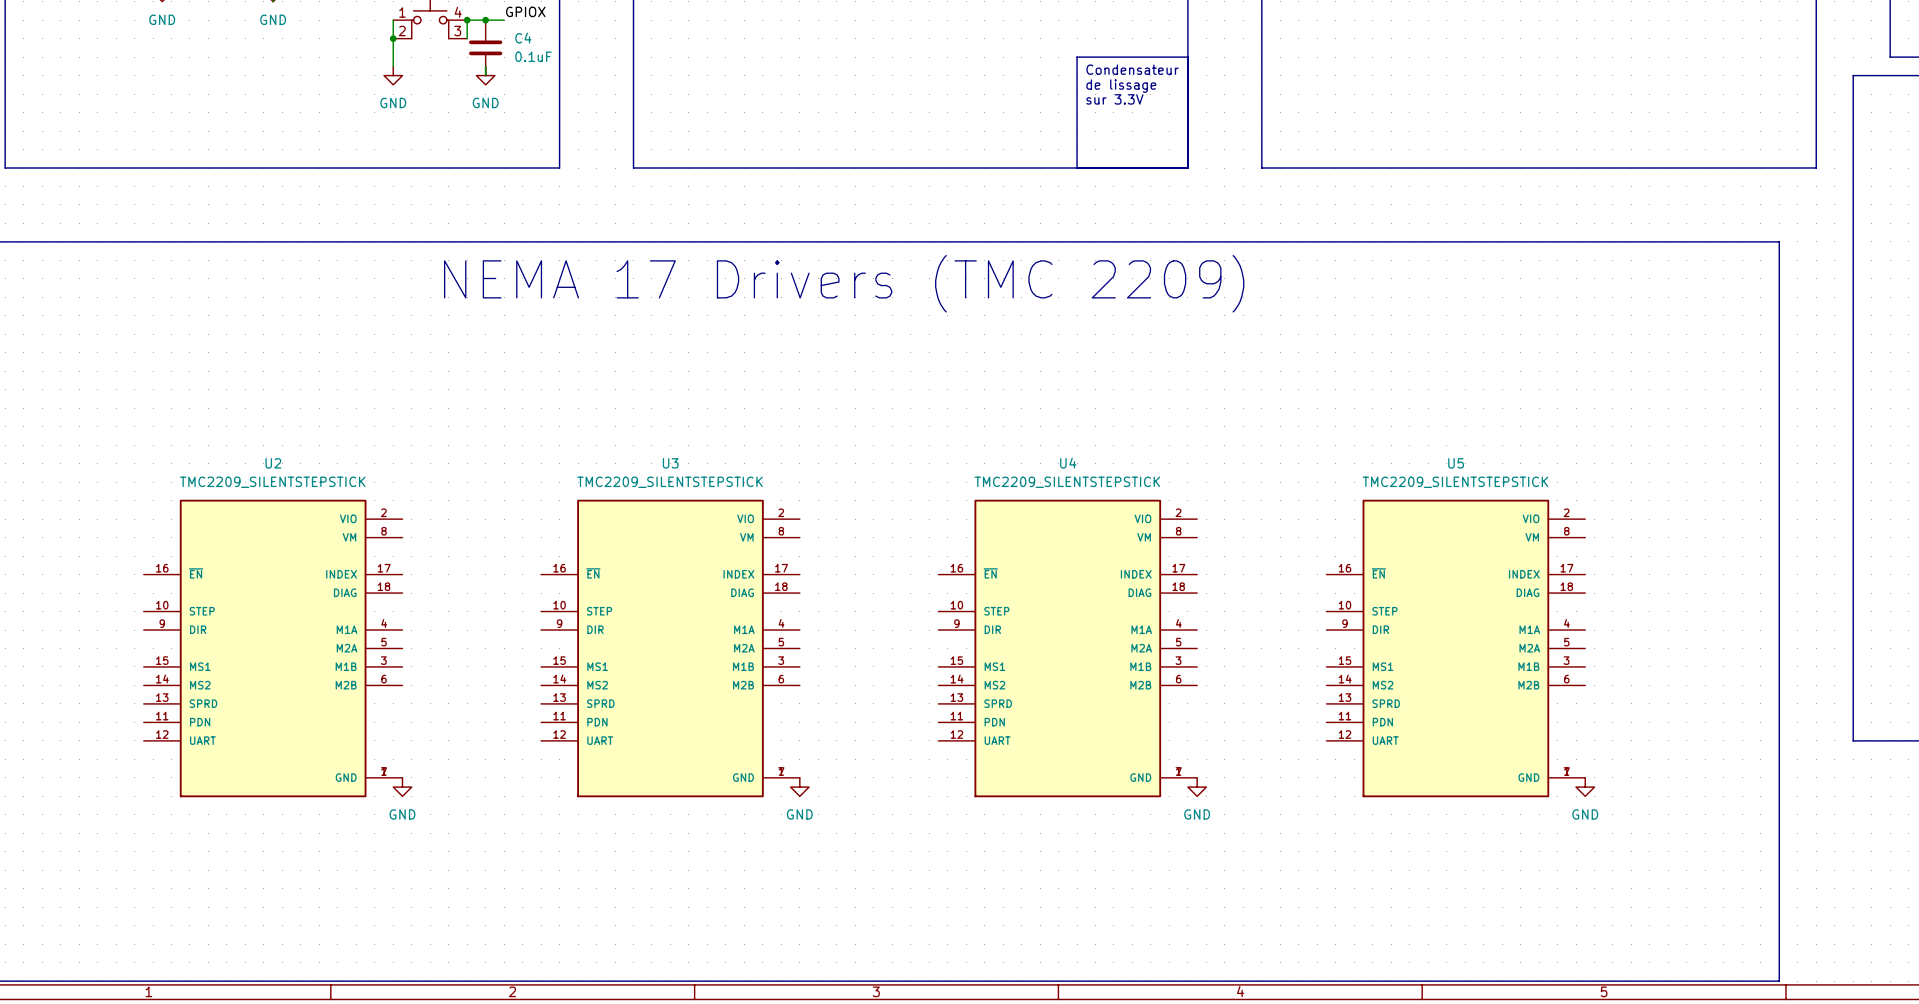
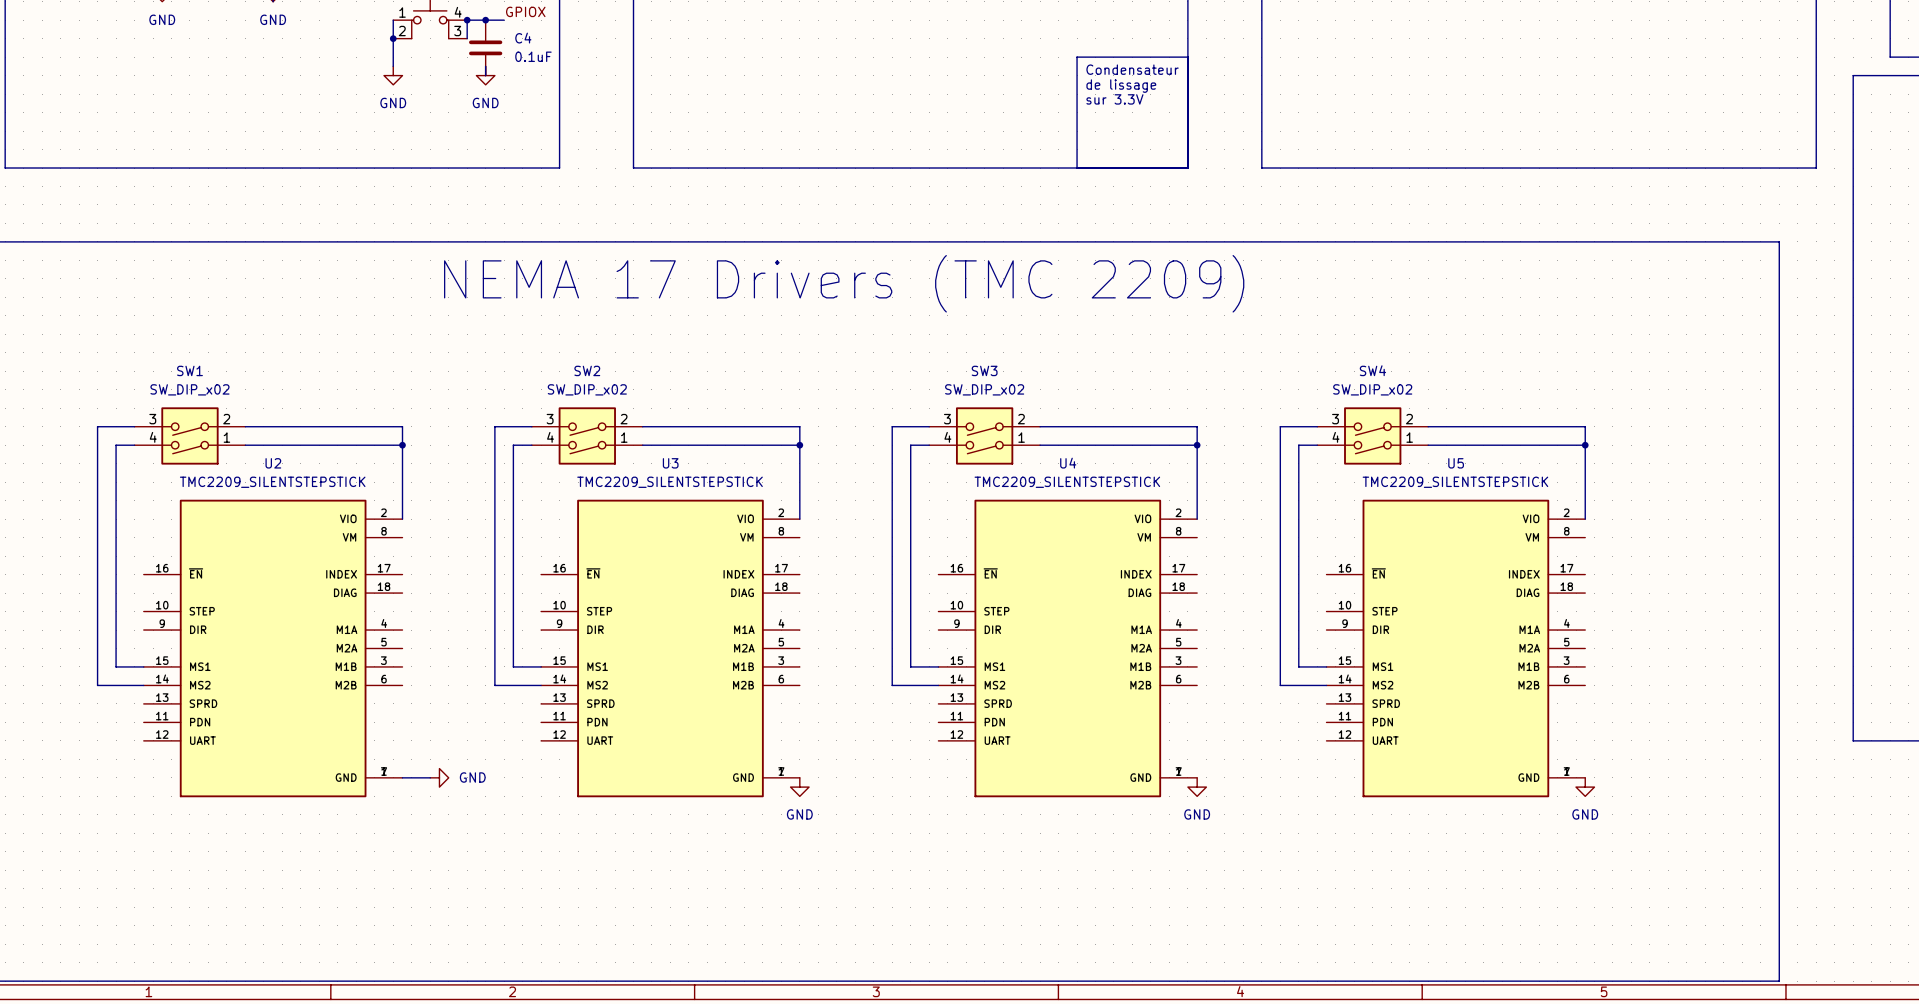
wire: none -> (134, 426) (97, 426) (97, 685) (143, 685)
wire: none -> (245, 426) (402, 426) (402, 519)
wire: none -> (531, 426) (494, 426) (494, 685) (541, 685)
wire: none -> (642, 426) (799, 426) (799, 519)
wire: none -> (929, 426) (892, 426) (892, 685) (938, 685)
wire: none -> (1040, 426) (1197, 426) (1197, 519)
wire: none -> (1317, 426) (1280, 426) (1280, 685) (1326, 685)
wire: none -> (1428, 426) (1585, 426) (1585, 519)
SW1: none -> SW_DIP_x02 (189, 435)
SW2: none -> SW_DIP_x02 (587, 435)
SW3: none -> SW_DIP_x02 (984, 435)
SW4: none -> SW_DIP_x02 (1372, 435)
wire: none -> (134, 445) (116, 445) (116, 666) (143, 666)
wire: none -> (245, 445) (402, 445)
junction: none -> (402, 445)
wire: none -> (531, 445) (513, 445) (513, 666) (541, 666)
wire: none -> (642, 445) (799, 445)
junction: none -> (799, 445)
wire: none -> (929, 445) (910, 445) (910, 666) (938, 666)
wire: none -> (1040, 445) (1197, 445)
junction: none -> (1197, 445)
wire: none -> (1317, 445) (1298, 445) (1298, 666) (1326, 666)
wire: none -> (1428, 445) (1585, 445)
junction: none -> (1585, 445)
wire: none -> (402, 777) (430, 777)
power symbol rotation: 0° (402, 787) -> 90° counterclockwise (439, 777)
power symbol position: GND (402, 787) -> GND (439, 777)

